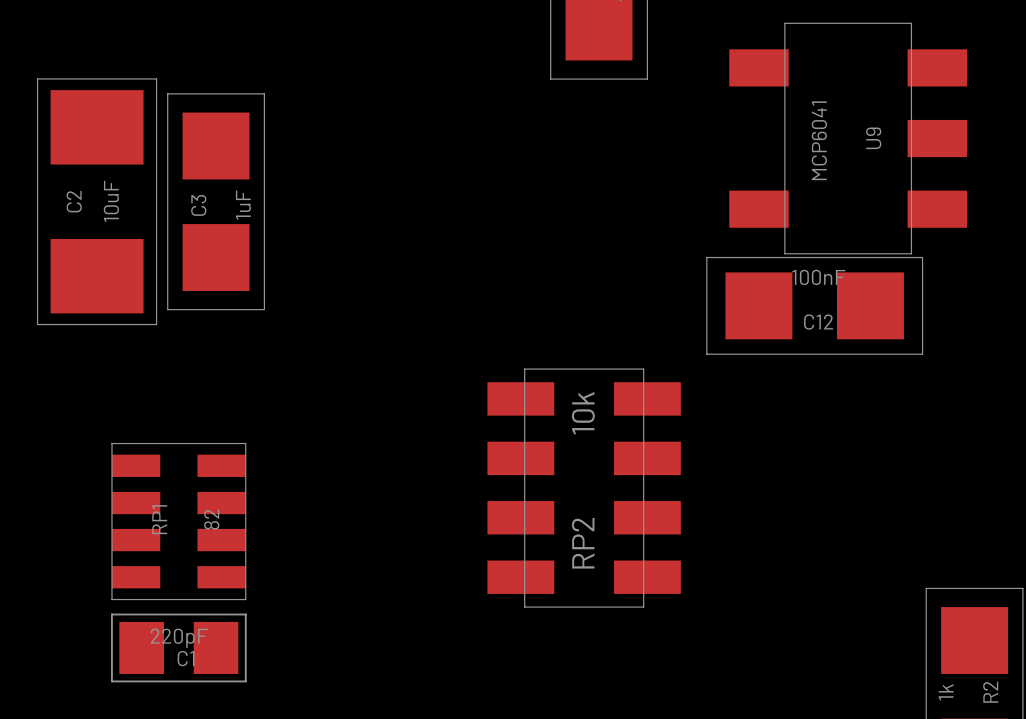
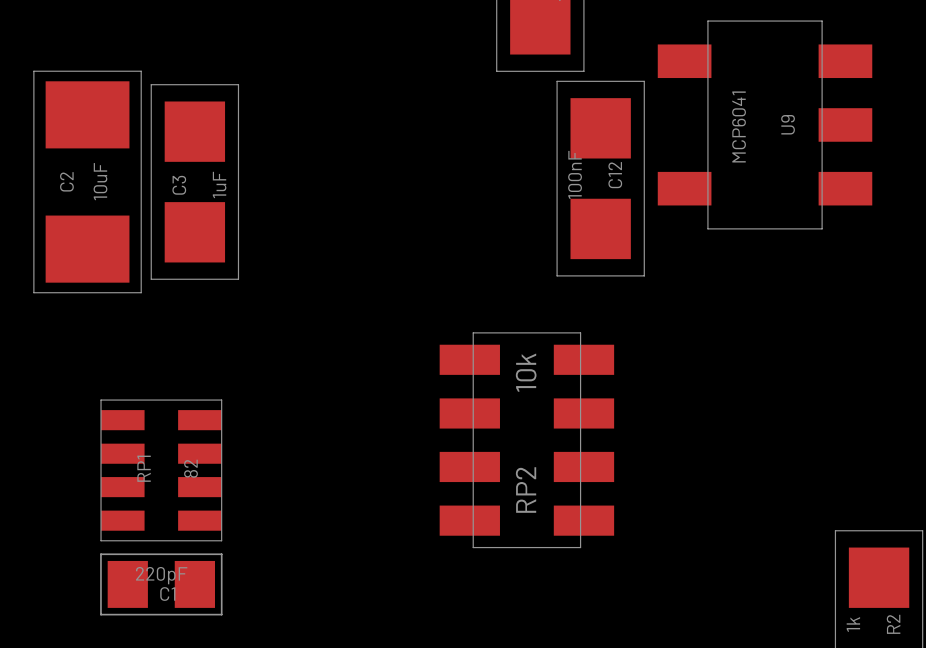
C12 rotation: 0° (814, 305) -> 90° clockwise (600, 178)
C12 position: (814, 305) -> (600, 178)

